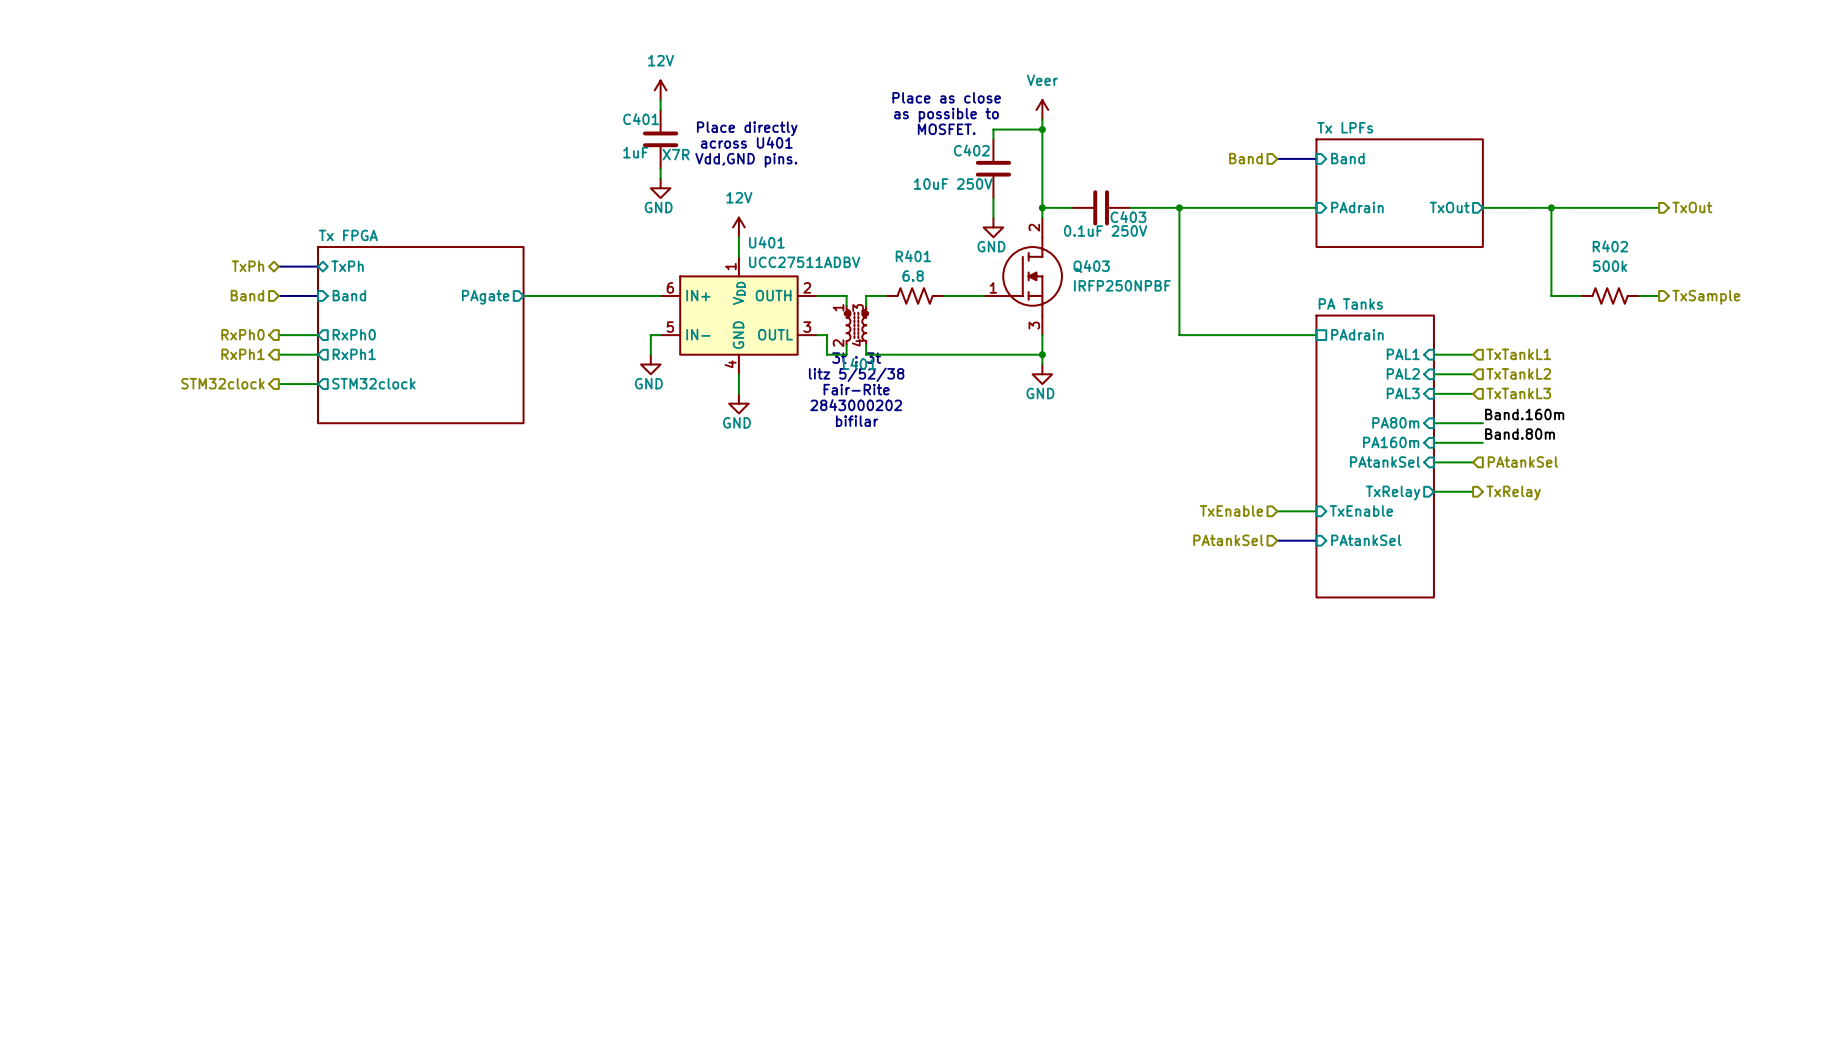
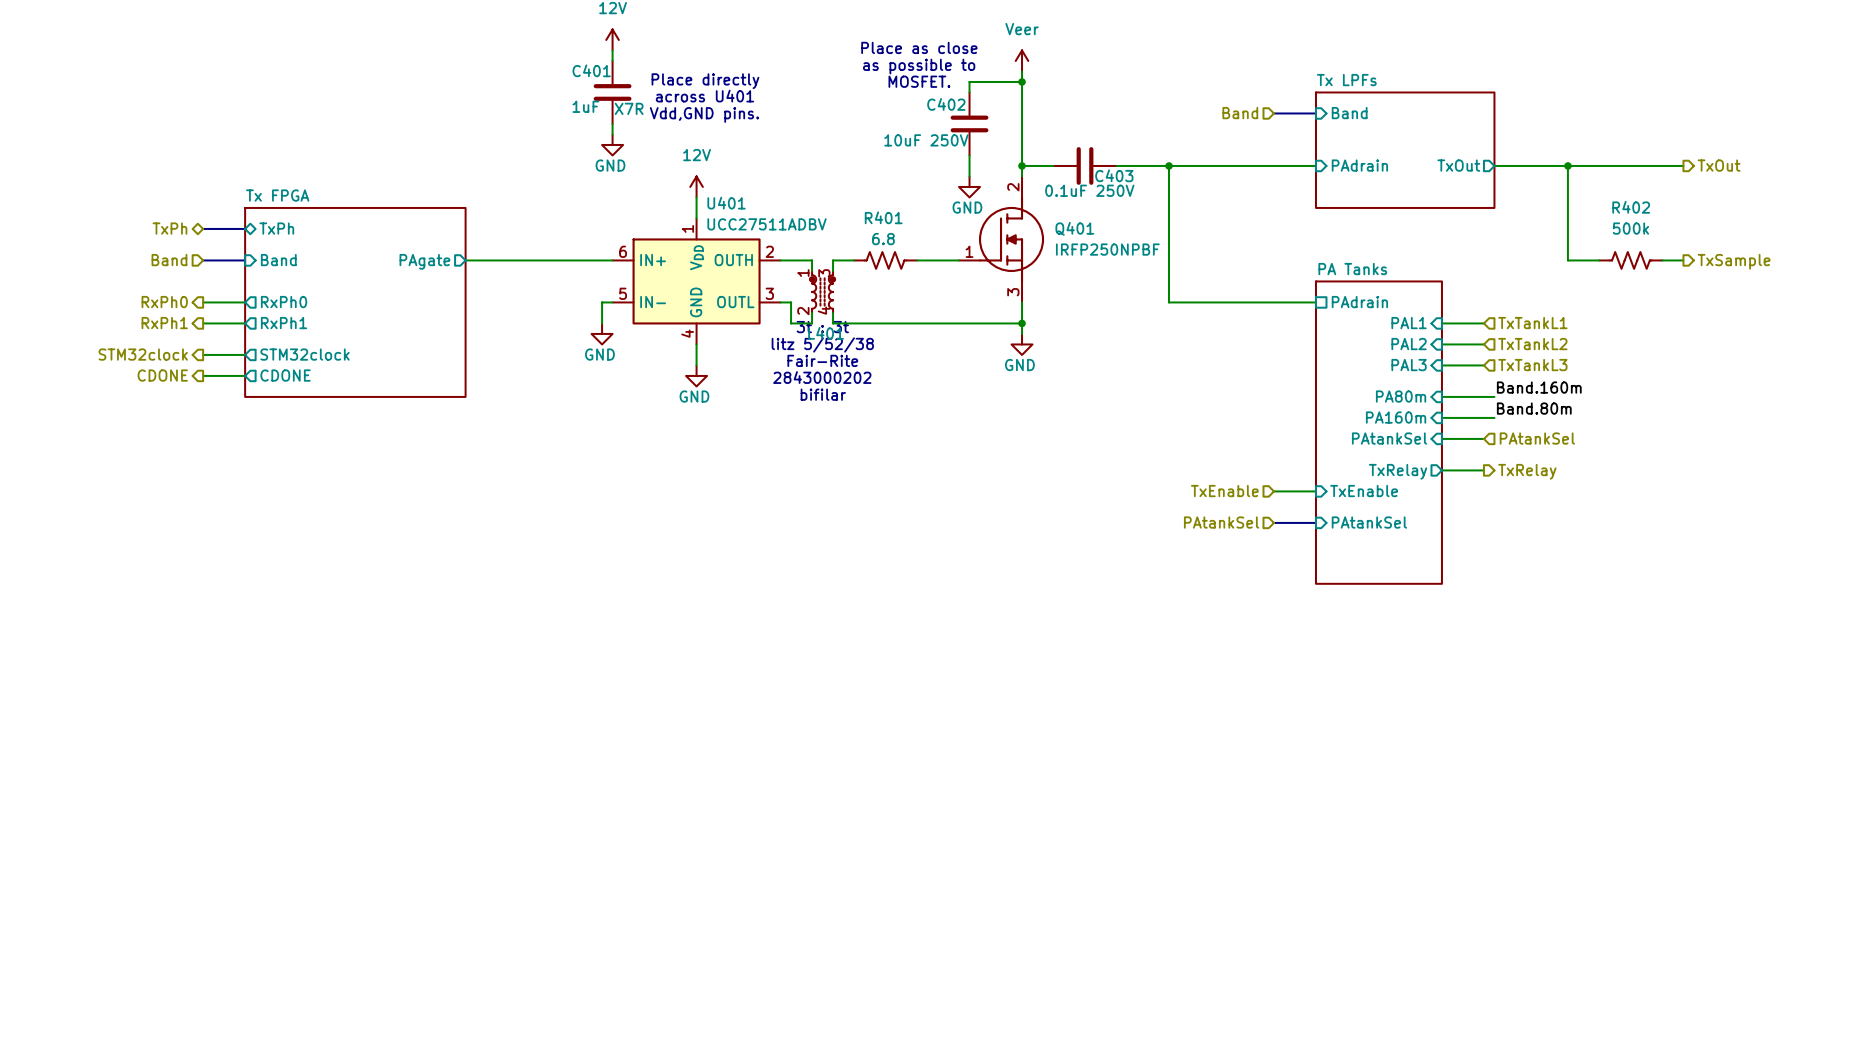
Q403 name: Q403 (1091, 266) -> Q401 (1074, 228)
hierarchical label: none -> CDONE (162, 375)
wire: none -> (203, 375) (245, 375)
sheet pin: none -> CDONE (285, 375)

